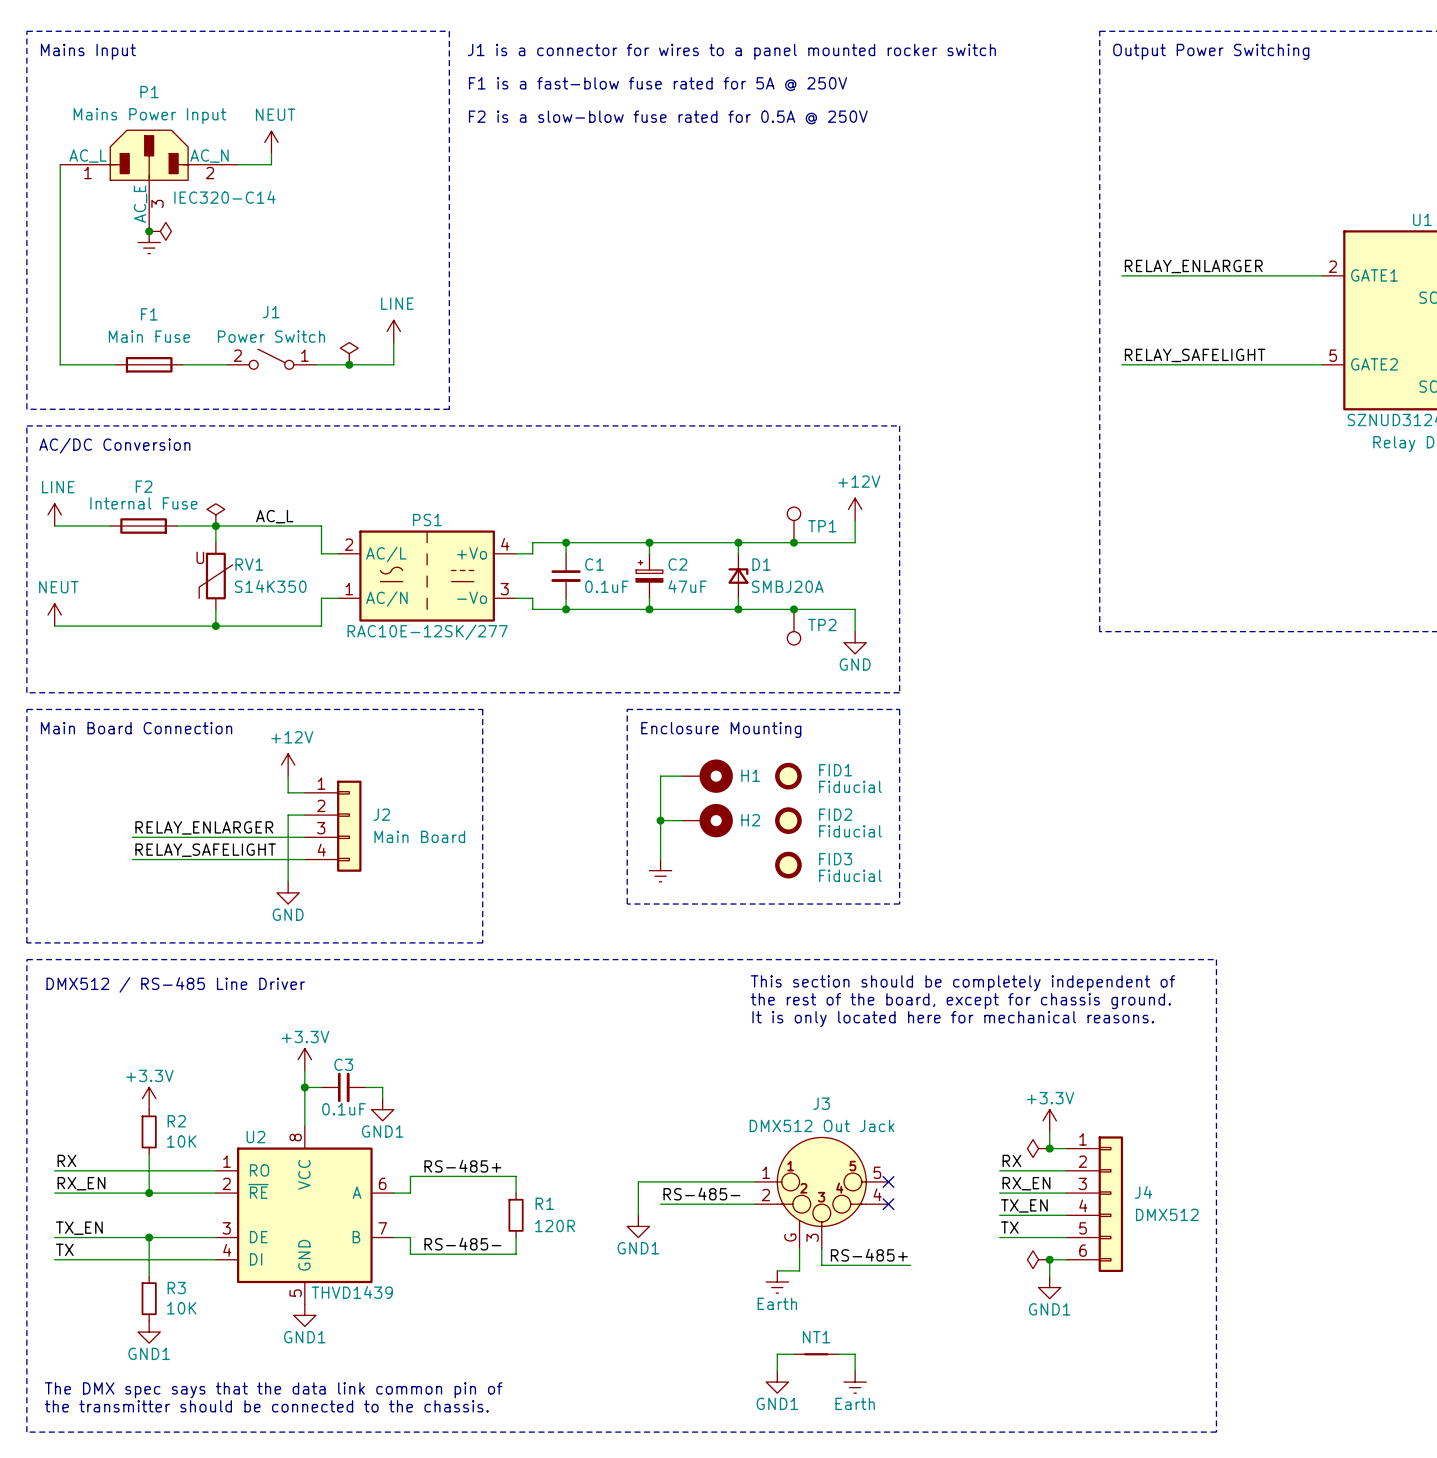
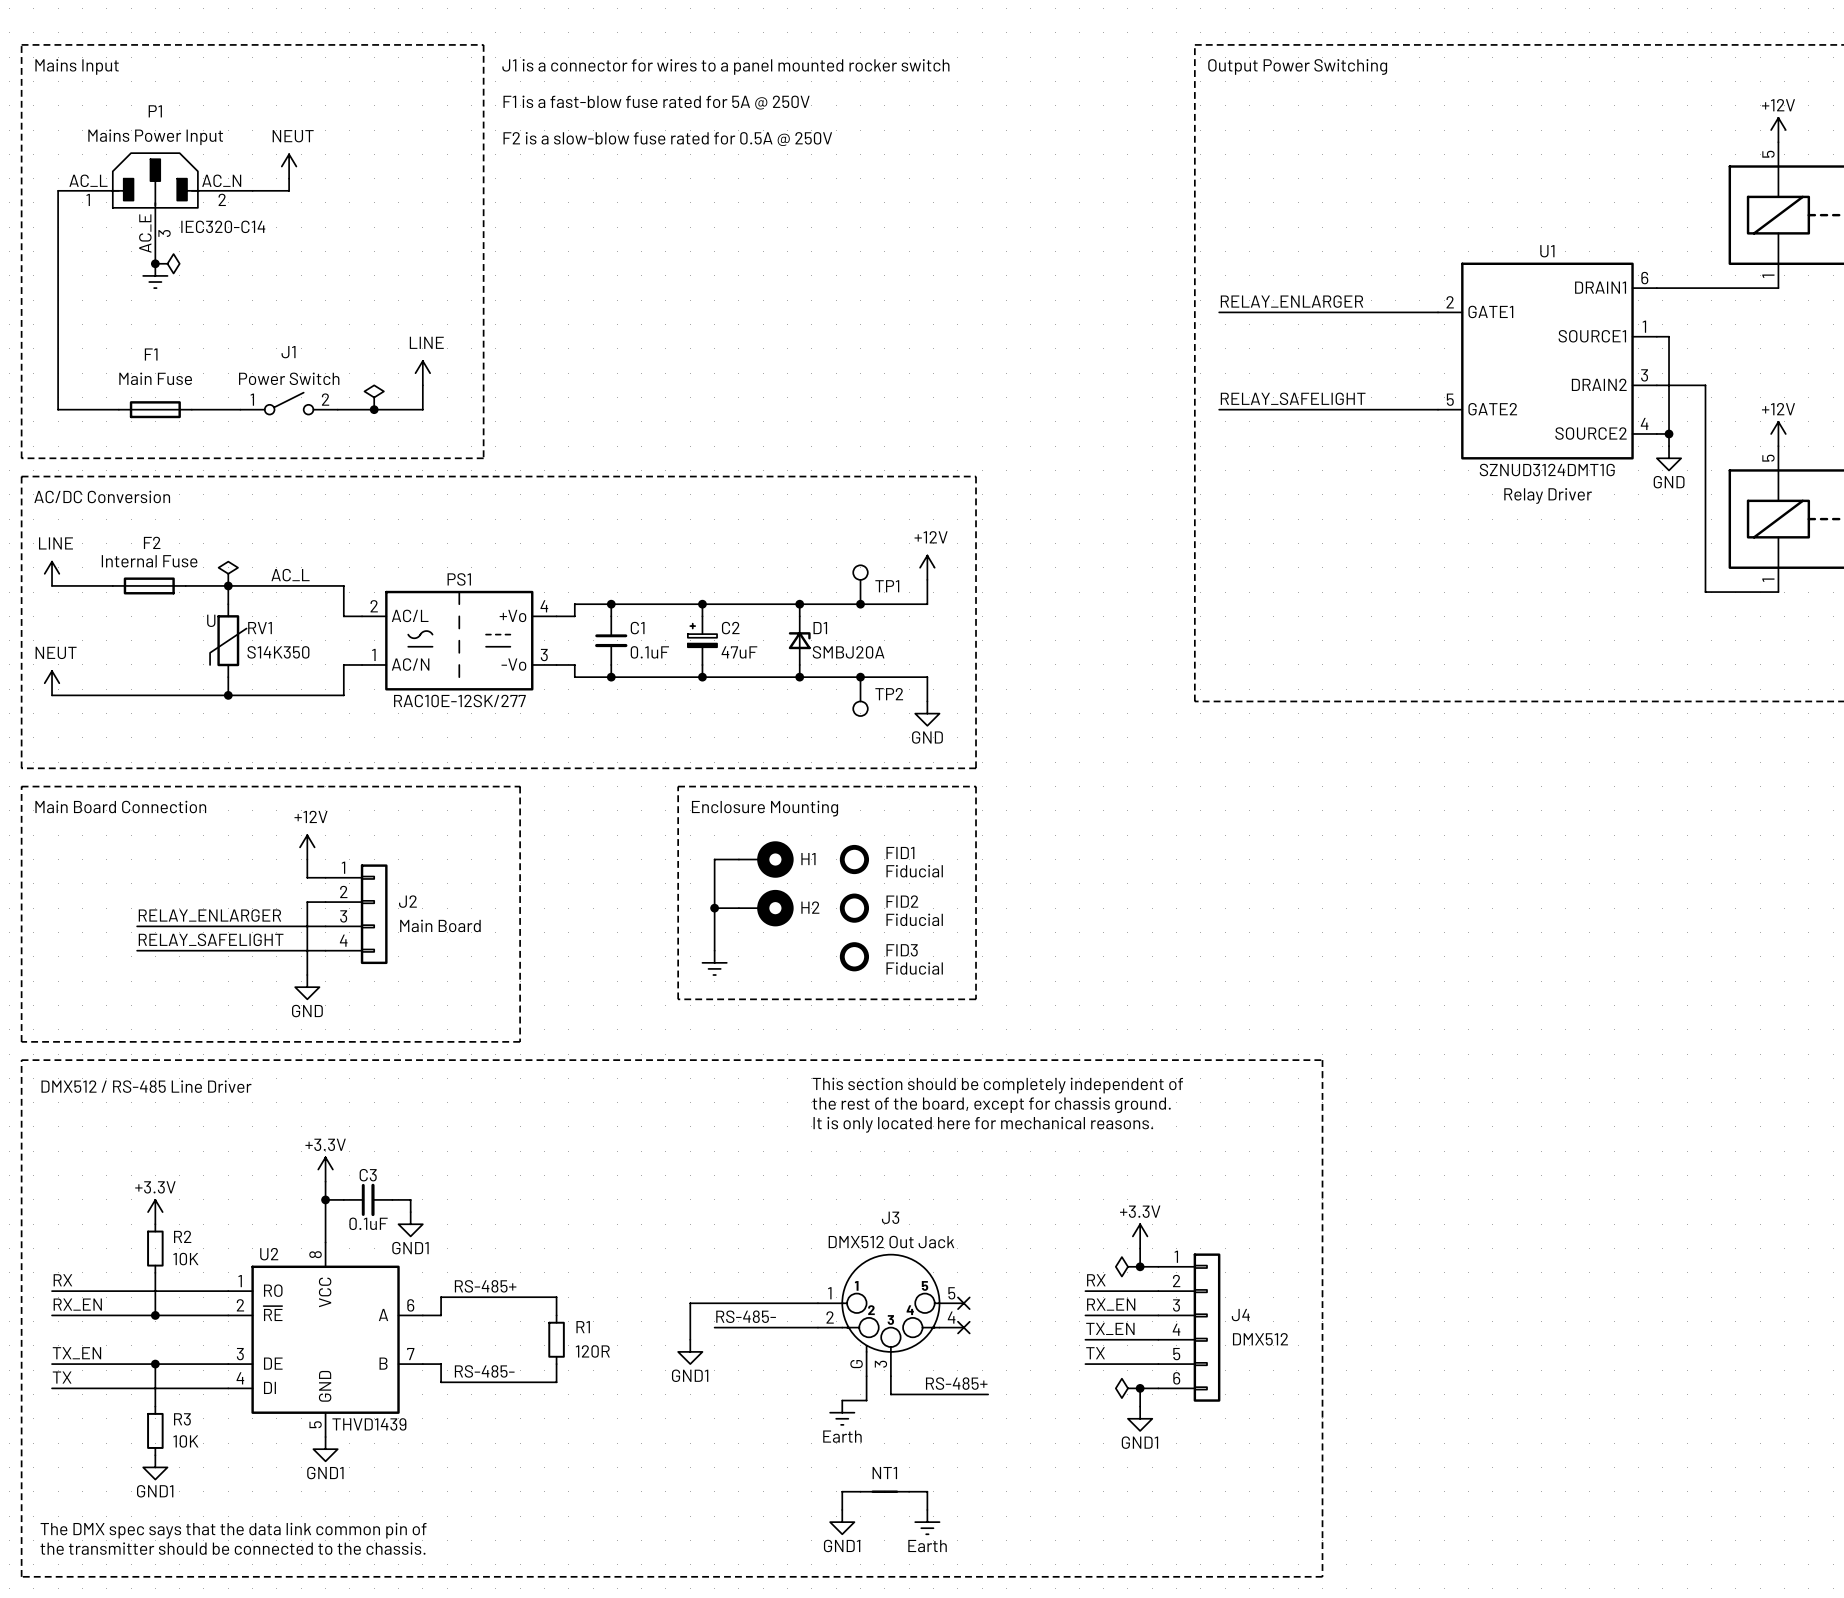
J1 flip: as is (271, 359) -> left-right (289, 403)

